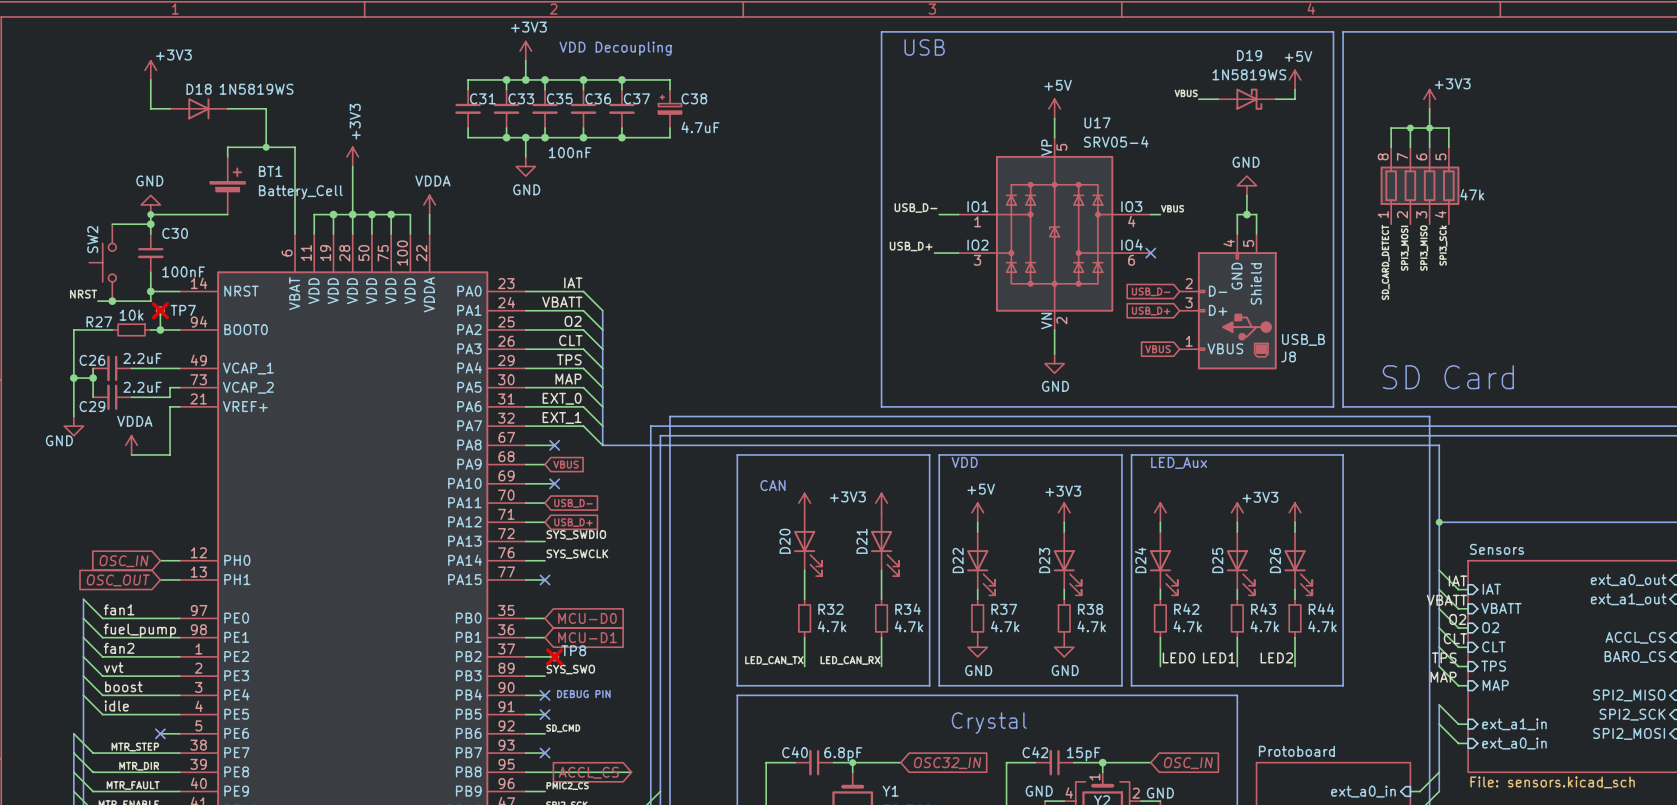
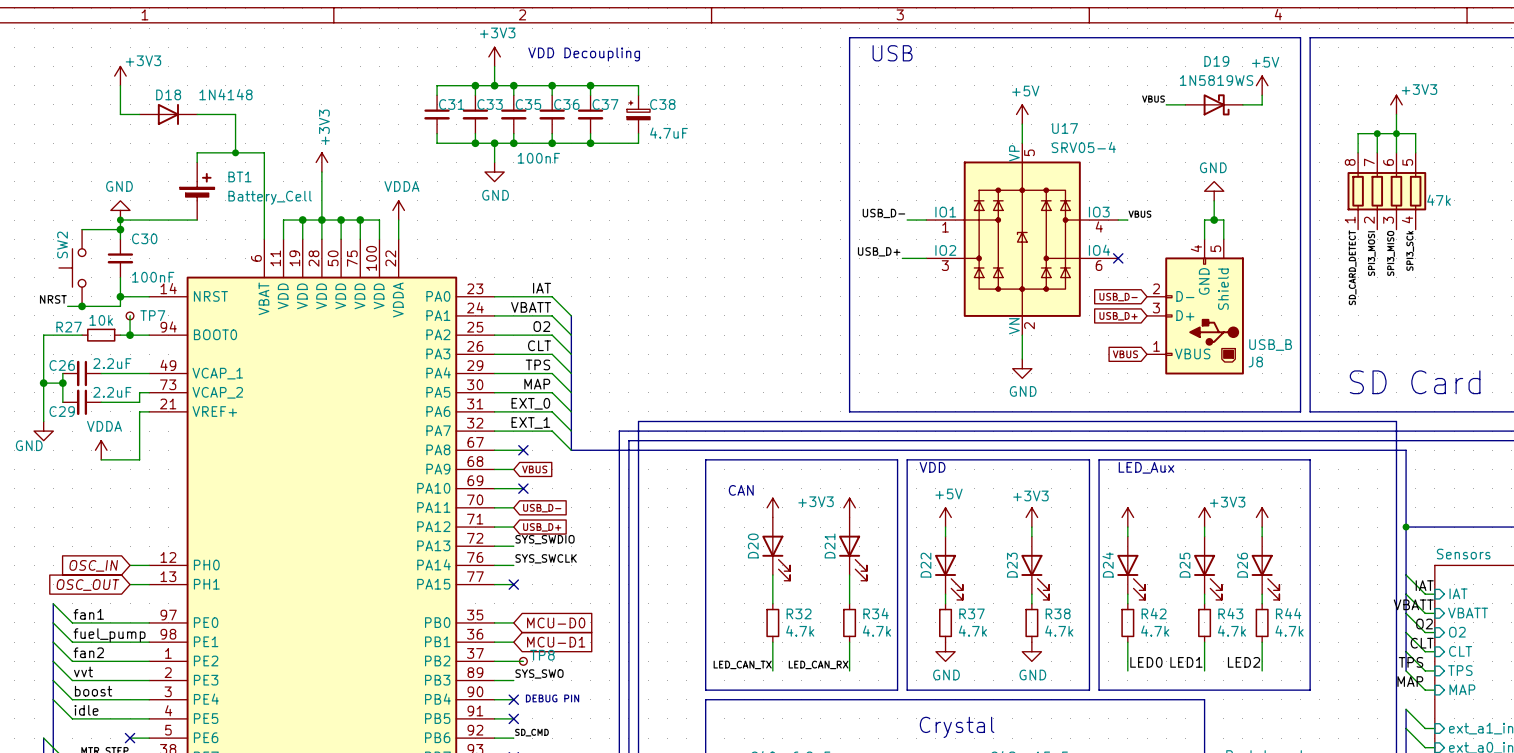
D18 value: 1N5819WS (256, 89) -> 1N4148 (225, 94)
TP7 do-not-place cross: (160, 310) -> none
TP8 do-not-place cross: (554, 656) -> none

